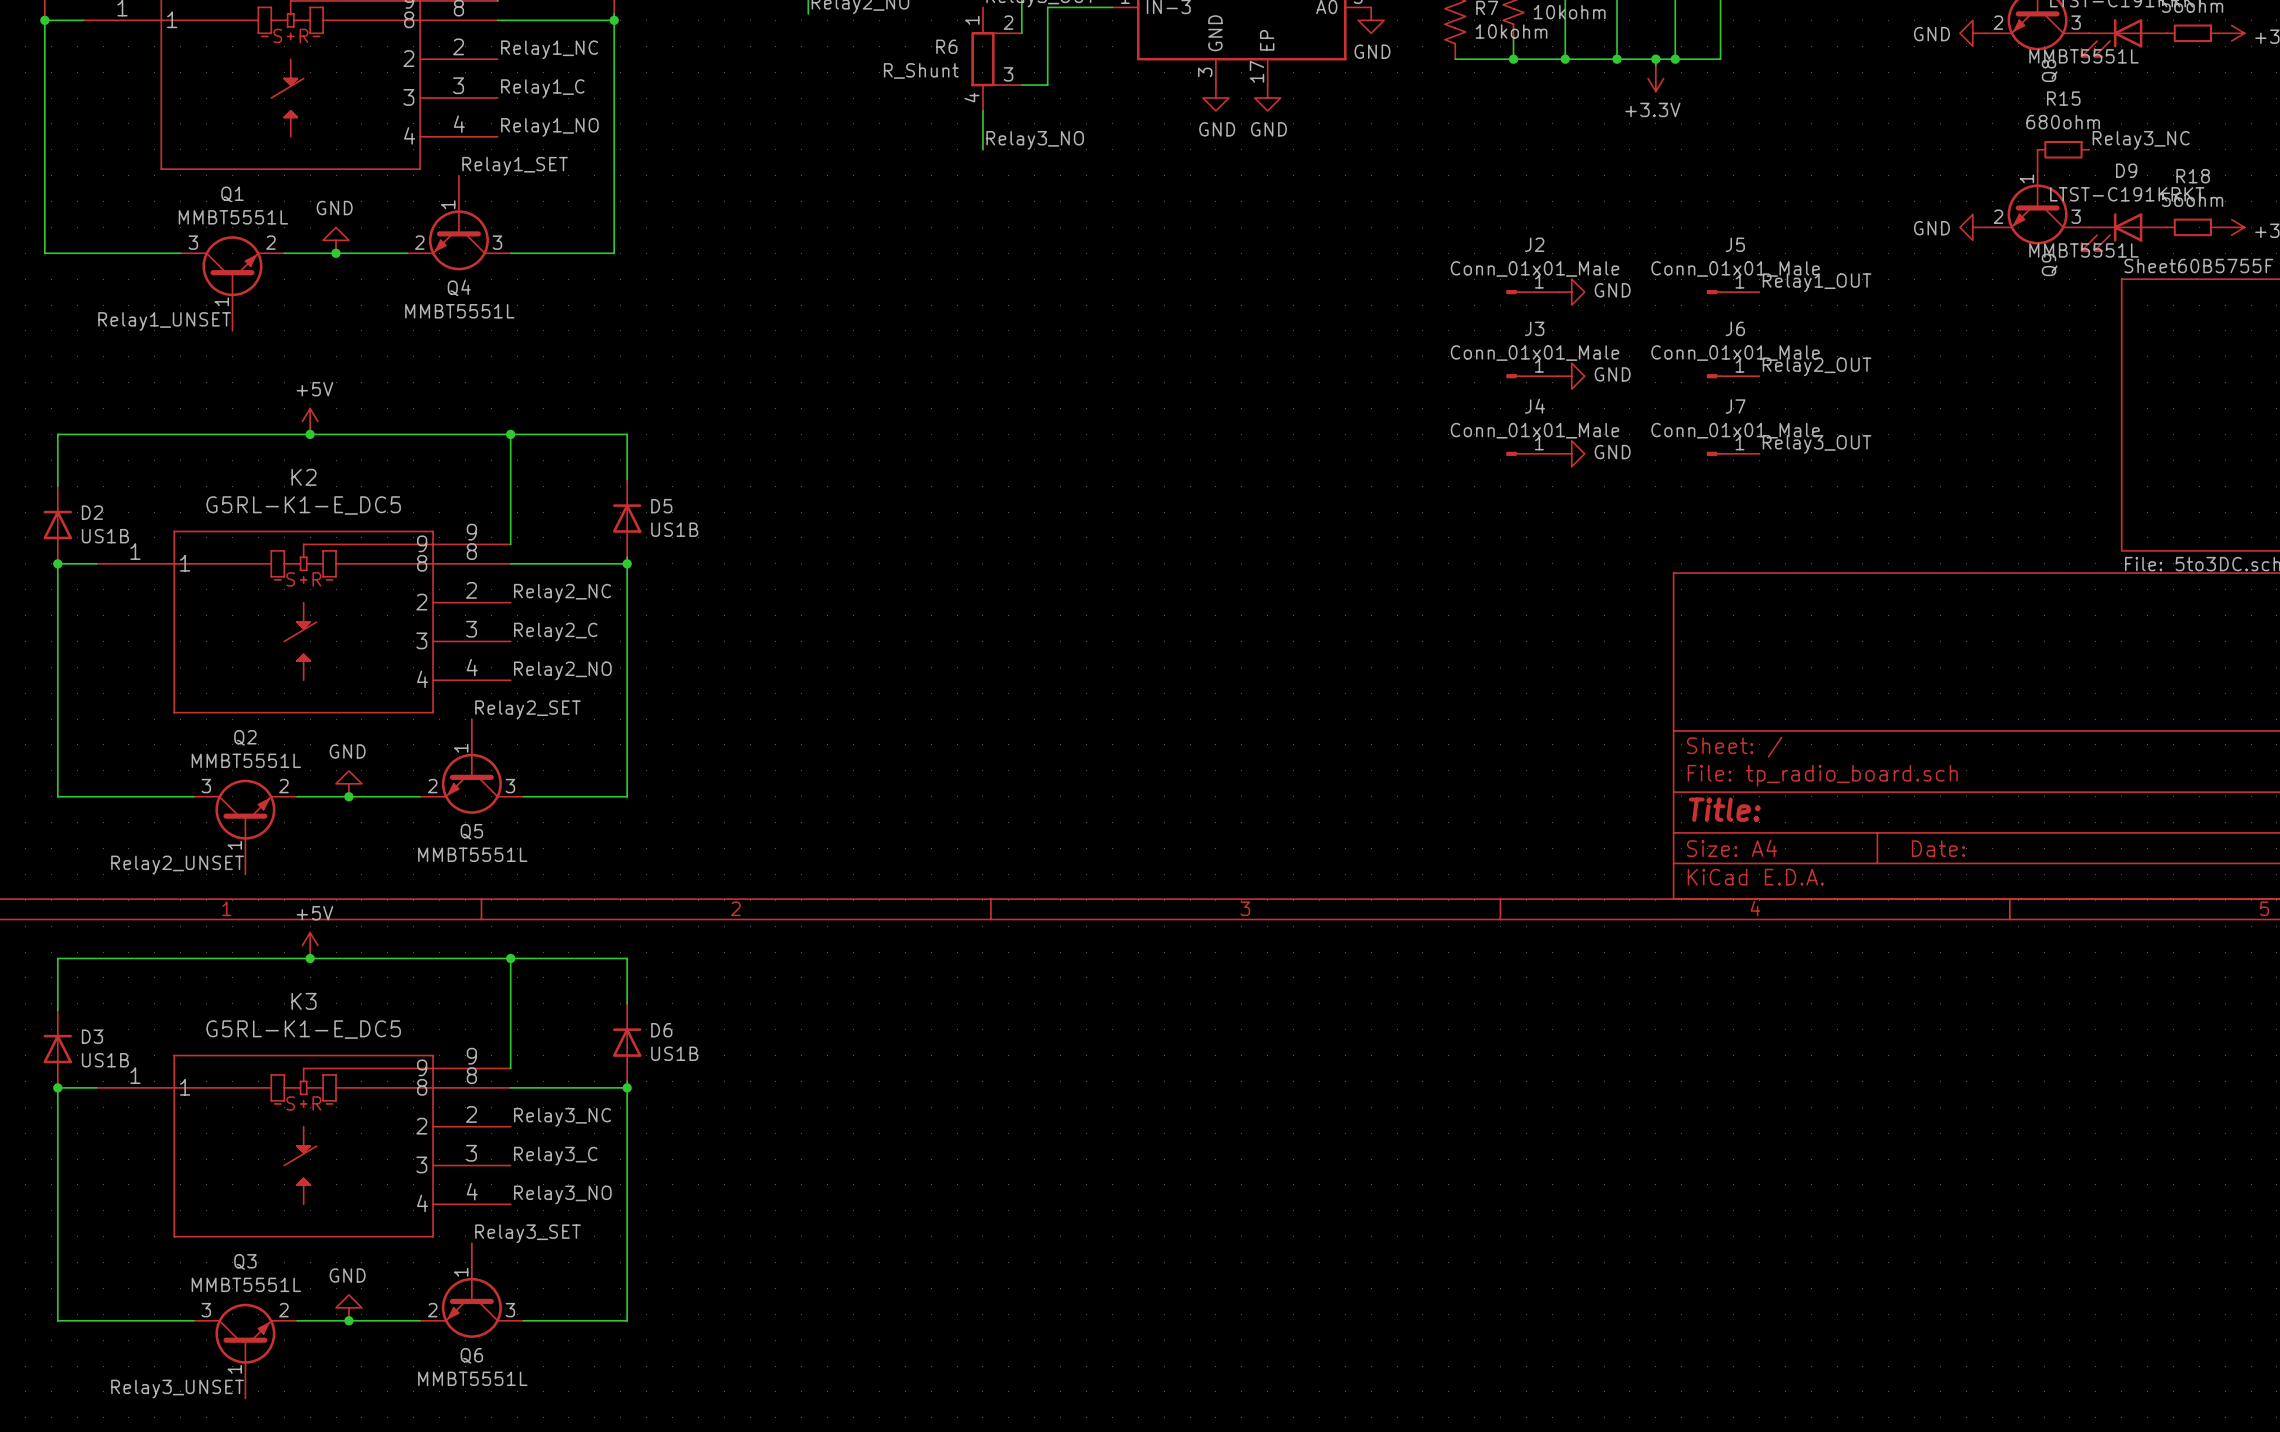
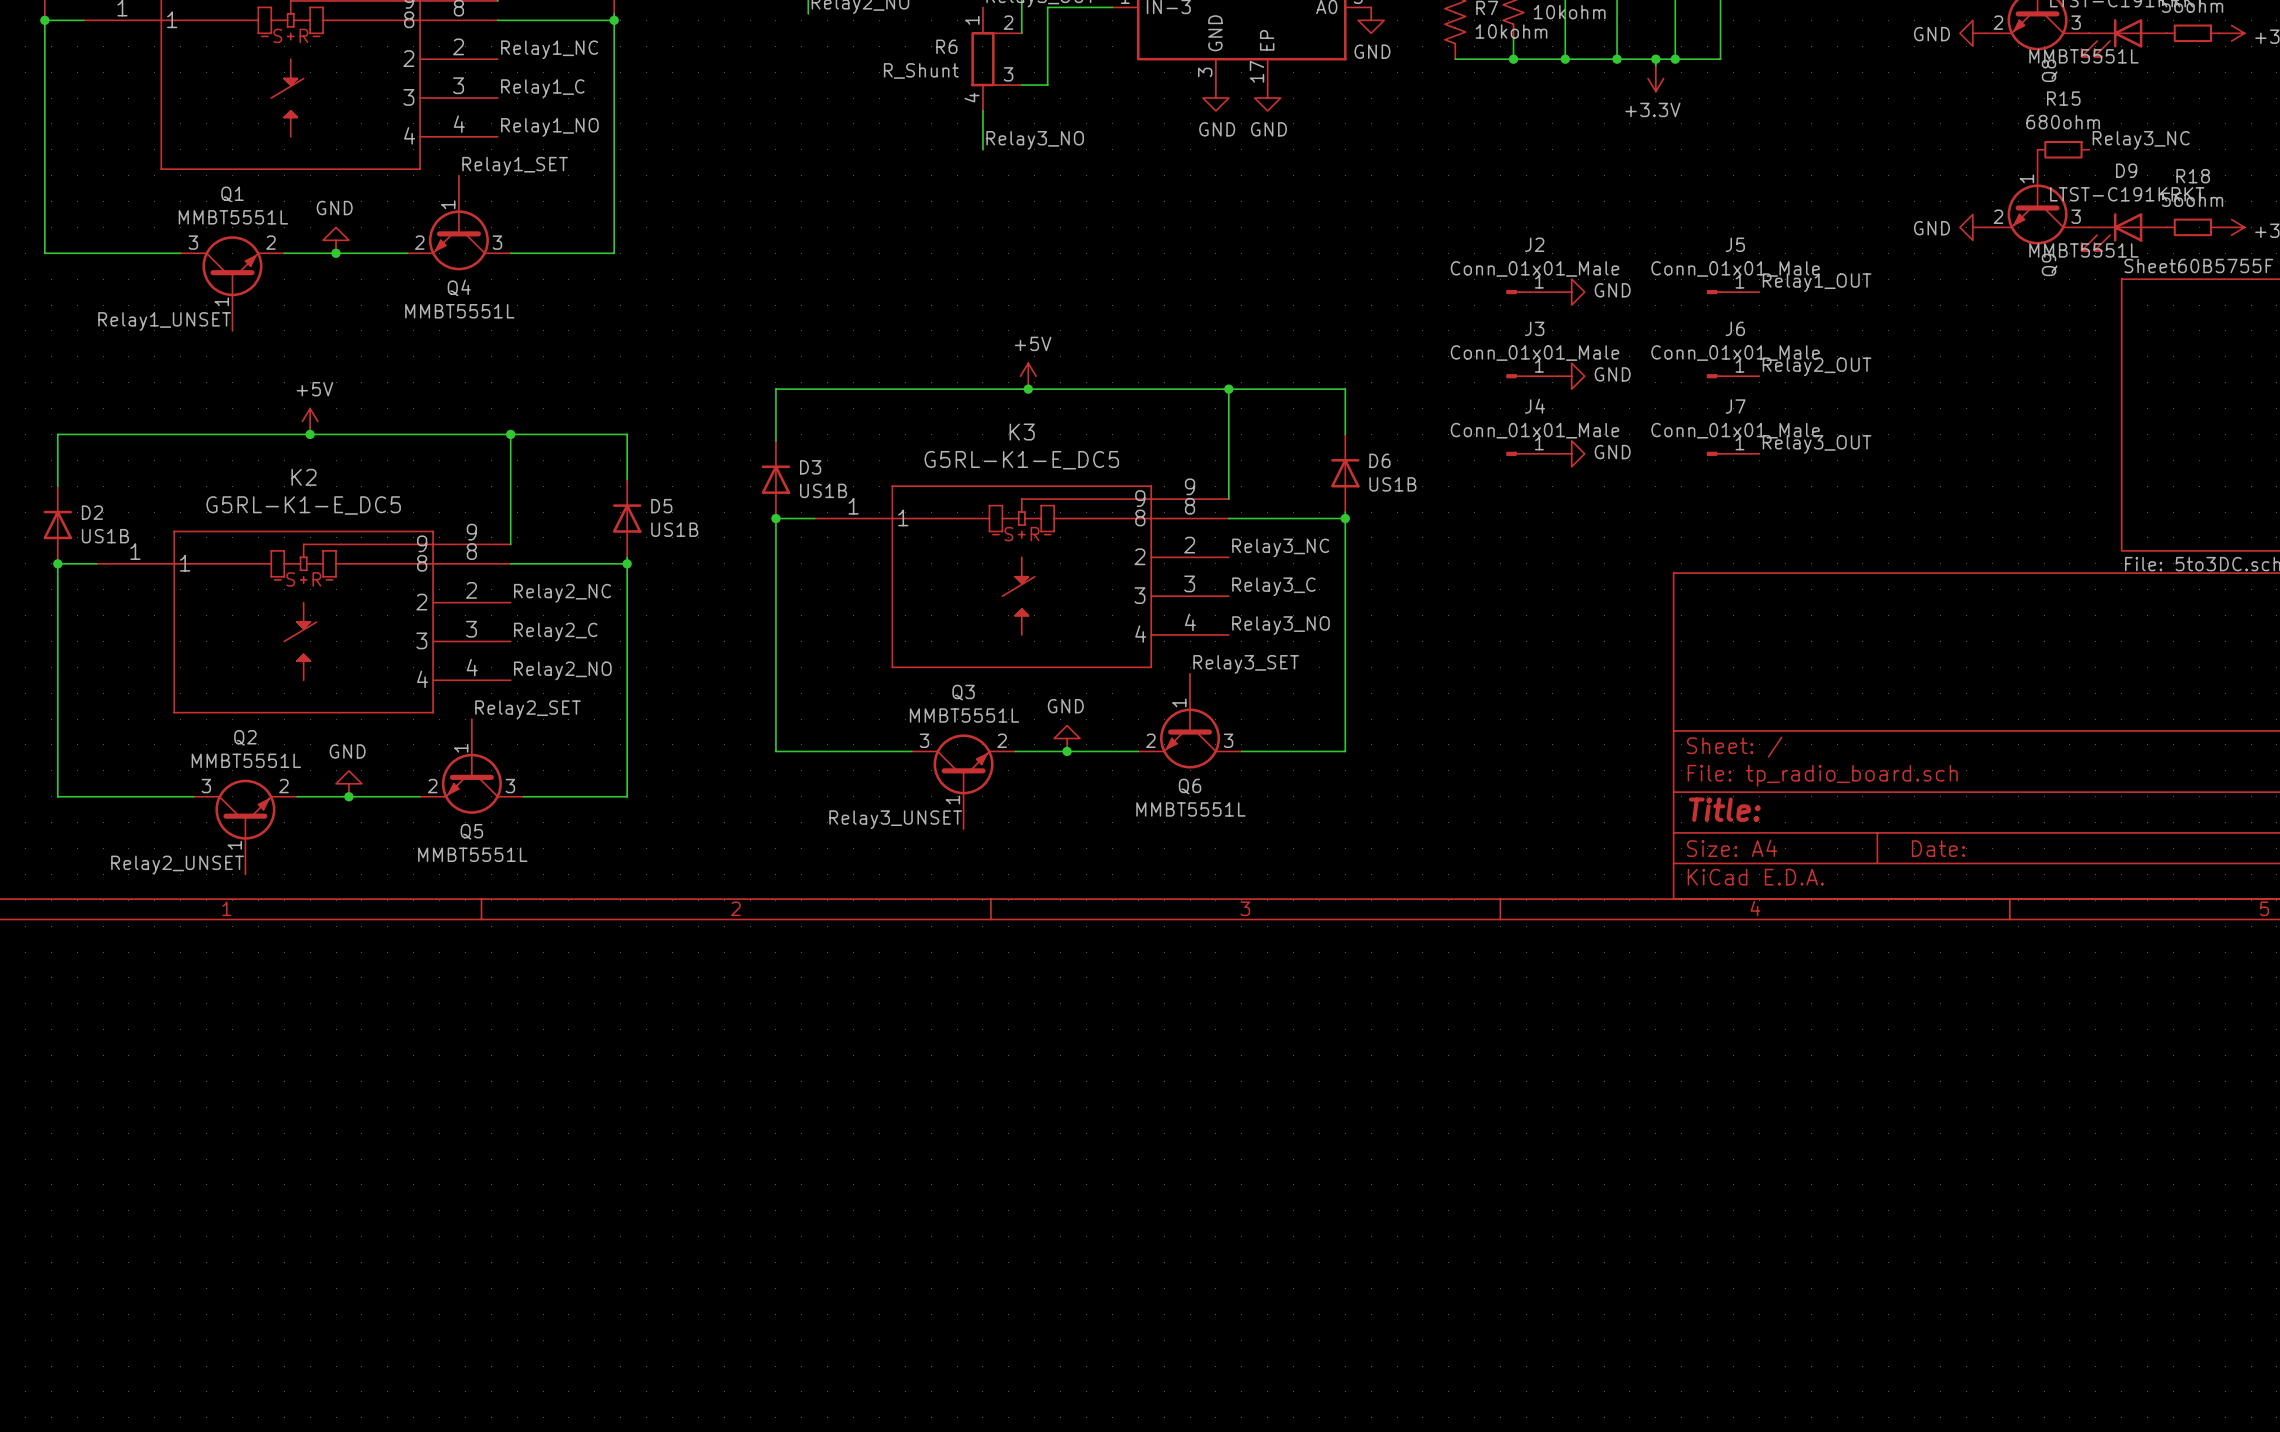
power symbol: none -> +5V (1028, 376)
junction: none -> (1028, 389)
wire: none -> (1228, 389) (1228, 499)
junction: none -> (1228, 389)
wire: none -> (1345, 434) (1345, 389) (775, 389) (775, 440)
wire: none -> (1345, 512) (1345, 751) (1241, 751)
junction: none -> (775, 518)
wire: none -> (814, 518) (775, 518) (775, 751) (911, 751)
wire: none -> (1228, 518) (1345, 518)
junction: none -> (1345, 518)
label: none -> Relay3_NC (1280, 547)
label: none -> Relay3_C (1273, 586)
label: none -> Relay3_NO (1281, 625)
label: none -> Relay3_SET (1246, 664)
power symbol: none -> GND (1067, 738)
wire: none -> (1015, 751) (1138, 751)
junction: none -> (1067, 751)
label: none -> Relay3_UNSET (895, 819)
power symbol: +5V (310, 945) -> none
junction: (310, 958) -> none
wire: (510, 958) (510, 1068) -> none
junction: (510, 958) -> none
wire: (627, 1003) (627, 958) (57, 958) (57, 1010) -> none
D6 position: (627, 1042) -> (1345, 473)
D3 position: (57, 1049) -> (775, 479)
wire: (627, 1081) (627, 1320) (523, 1320) -> none
junction: (57, 1087) -> none
wire: (96, 1087) (57, 1087) (57, 1320) (193, 1320) -> none
wire: (510, 1087) (627, 1087) -> none
junction: (627, 1087) -> none
label: Relay3_NC (562, 1117) -> none
K3 position: (303, 1146) -> (1021, 576)
label: Relay3_C (555, 1156) -> none
label: Relay3_NO (562, 1194) -> none
label: Relay3_SET (528, 1233) -> none
Q6 position: (471, 1290) -> (1190, 721)
power symbol: GND (348, 1307) -> none
wire: (297, 1320) (420, 1320) -> none
junction: (348, 1320) -> none
Q3 position: (245, 1351) -> (963, 781)
label: Relay3_UNSET (177, 1389) -> none

